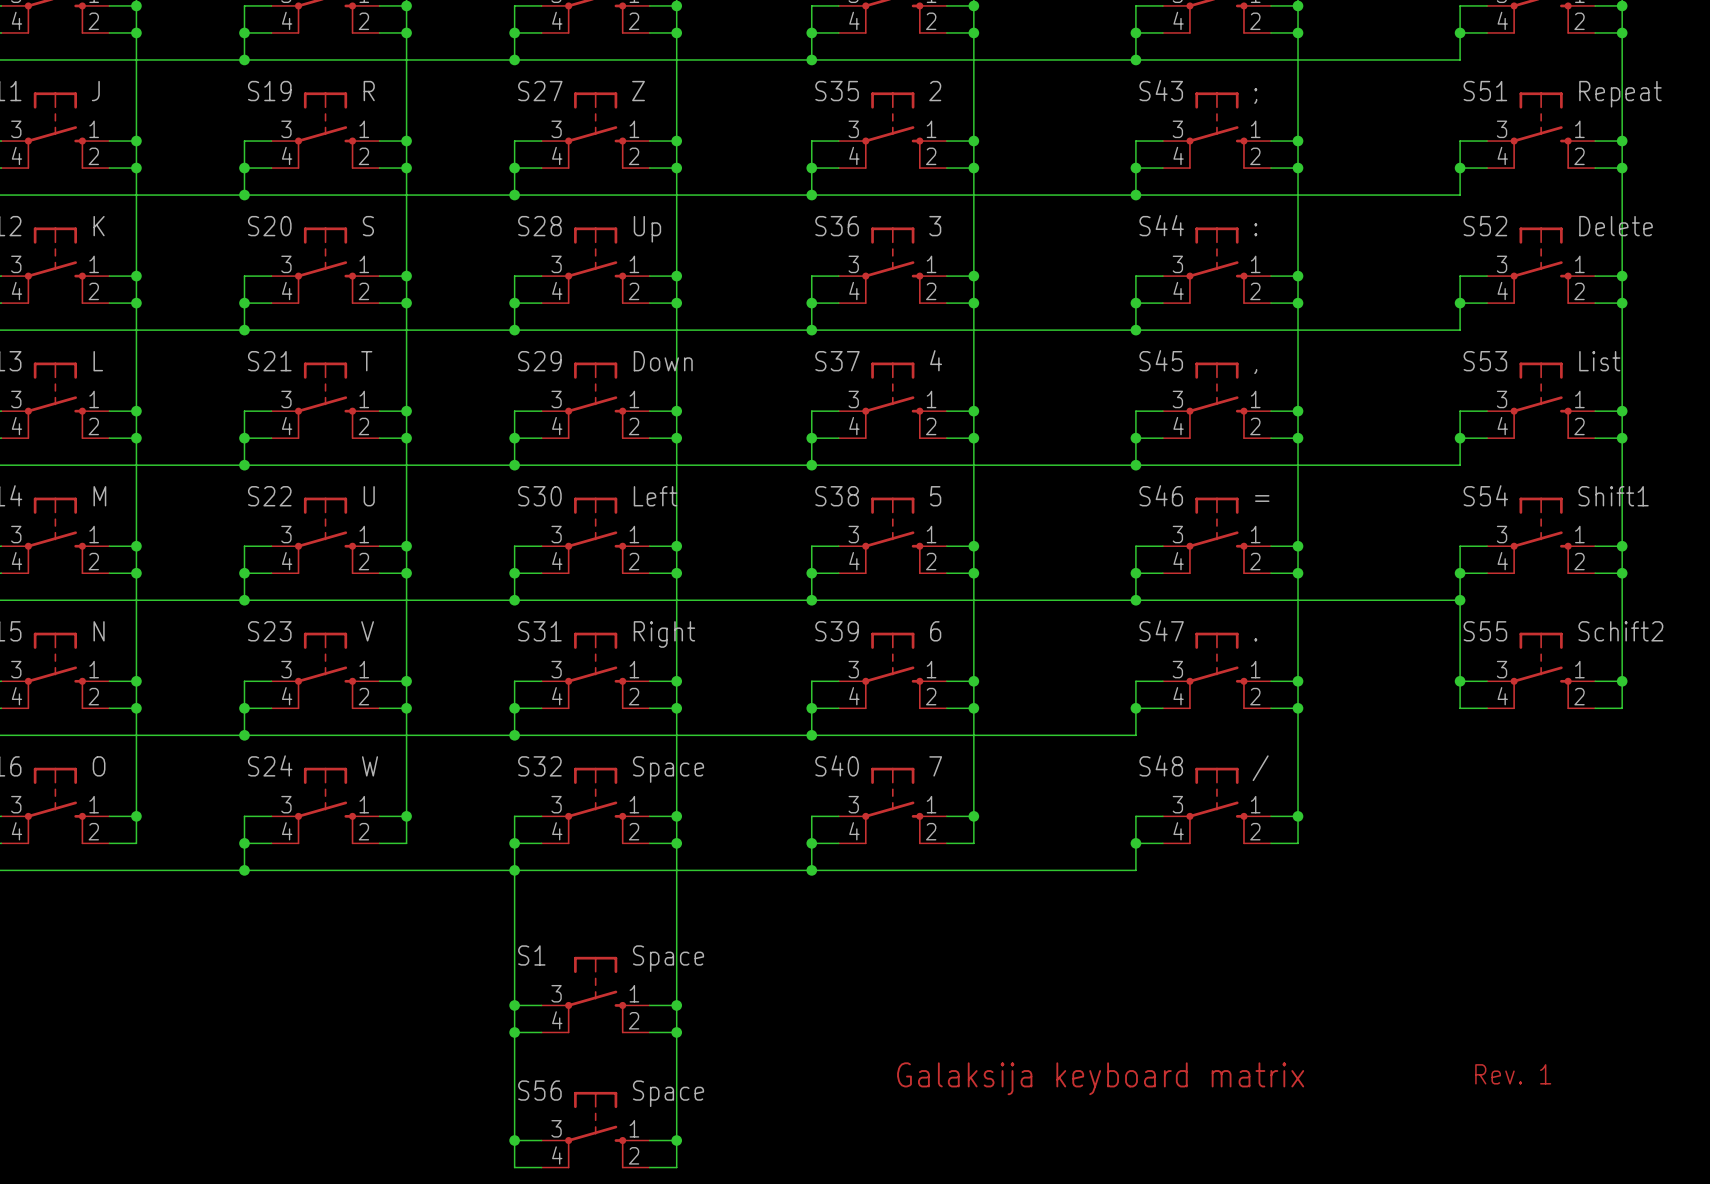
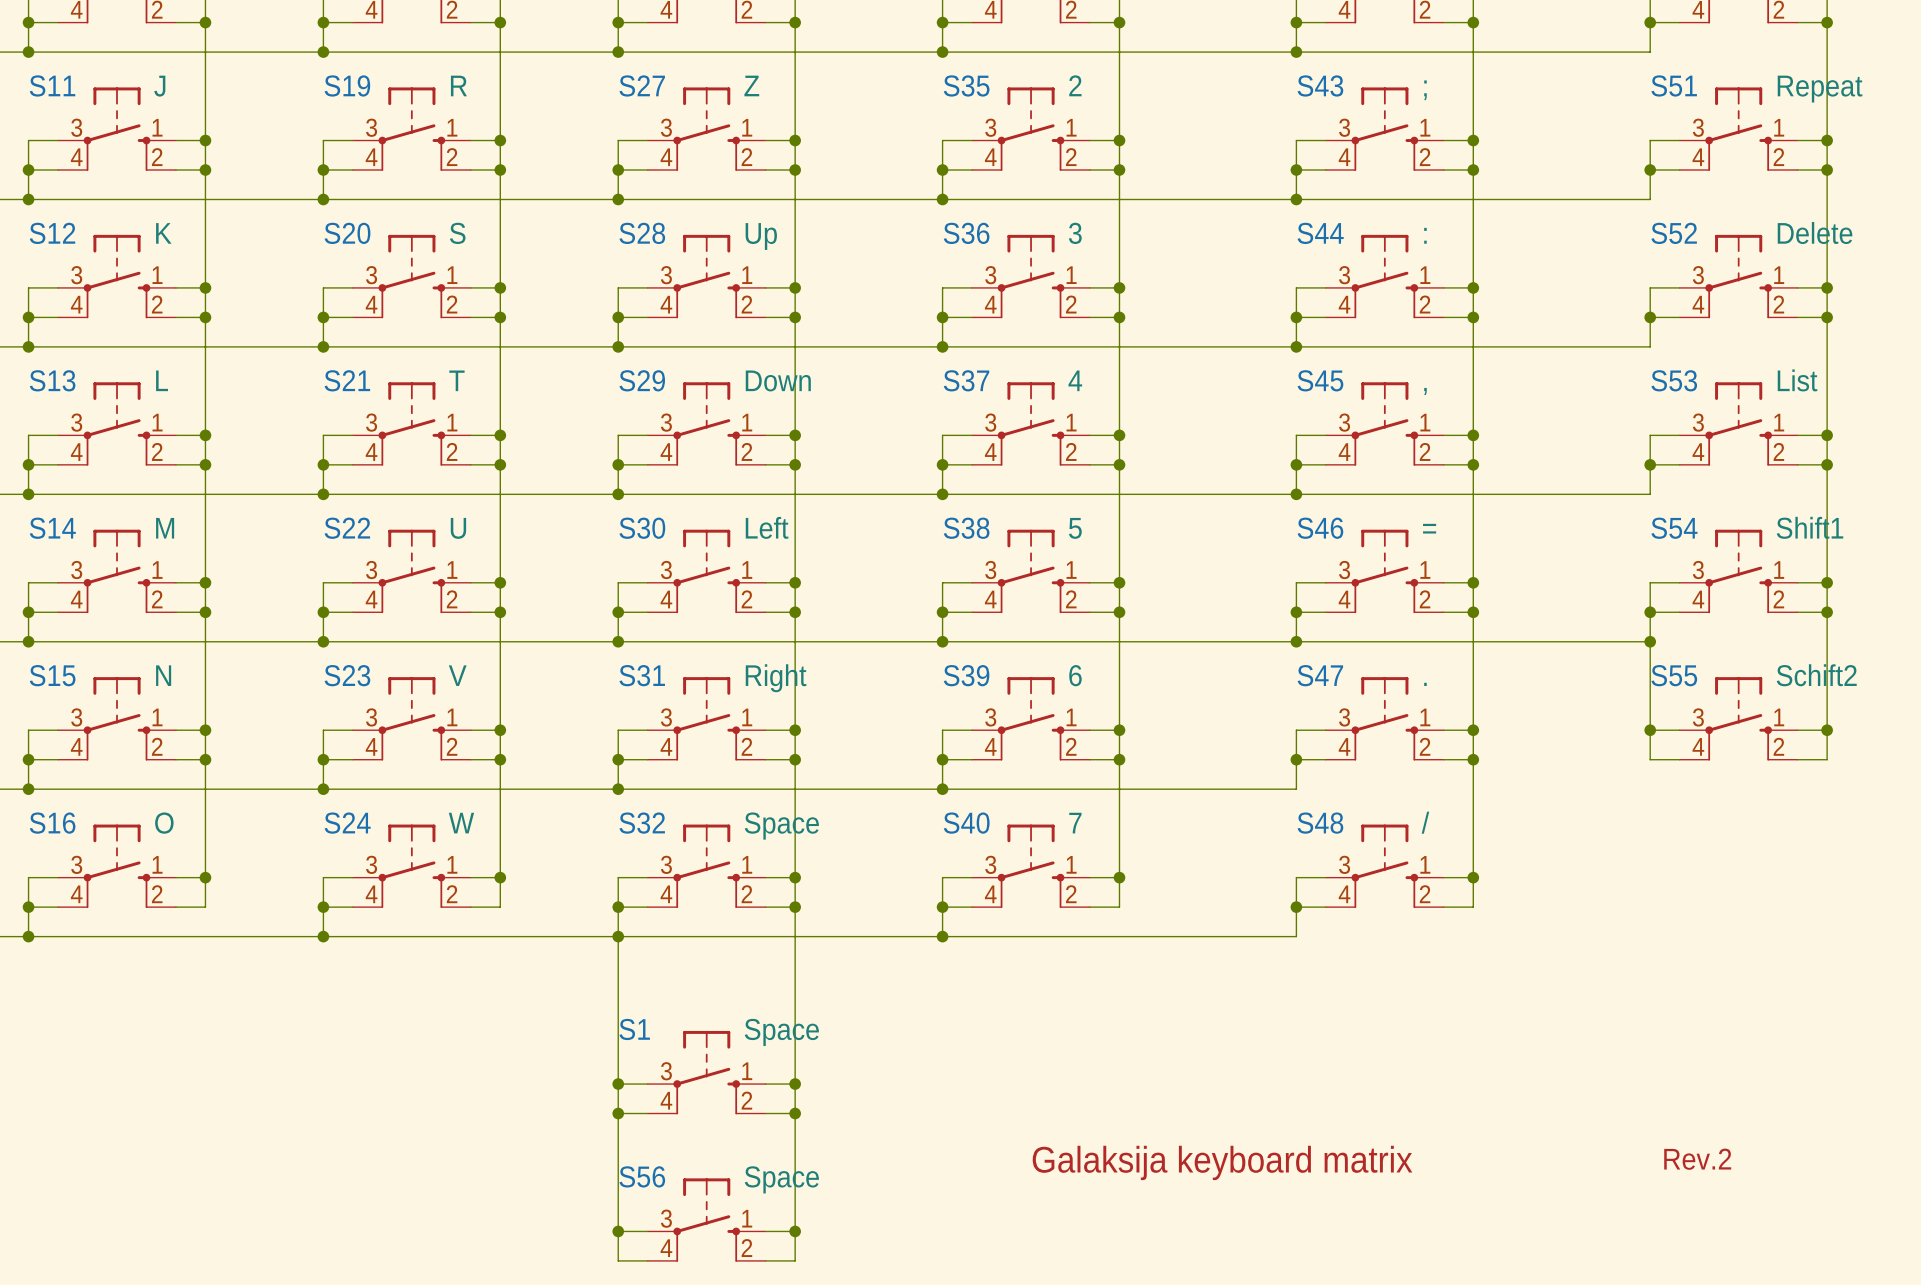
text: Rev. 1 (1513, 1074) -> Rev.2 (1697, 1159)

